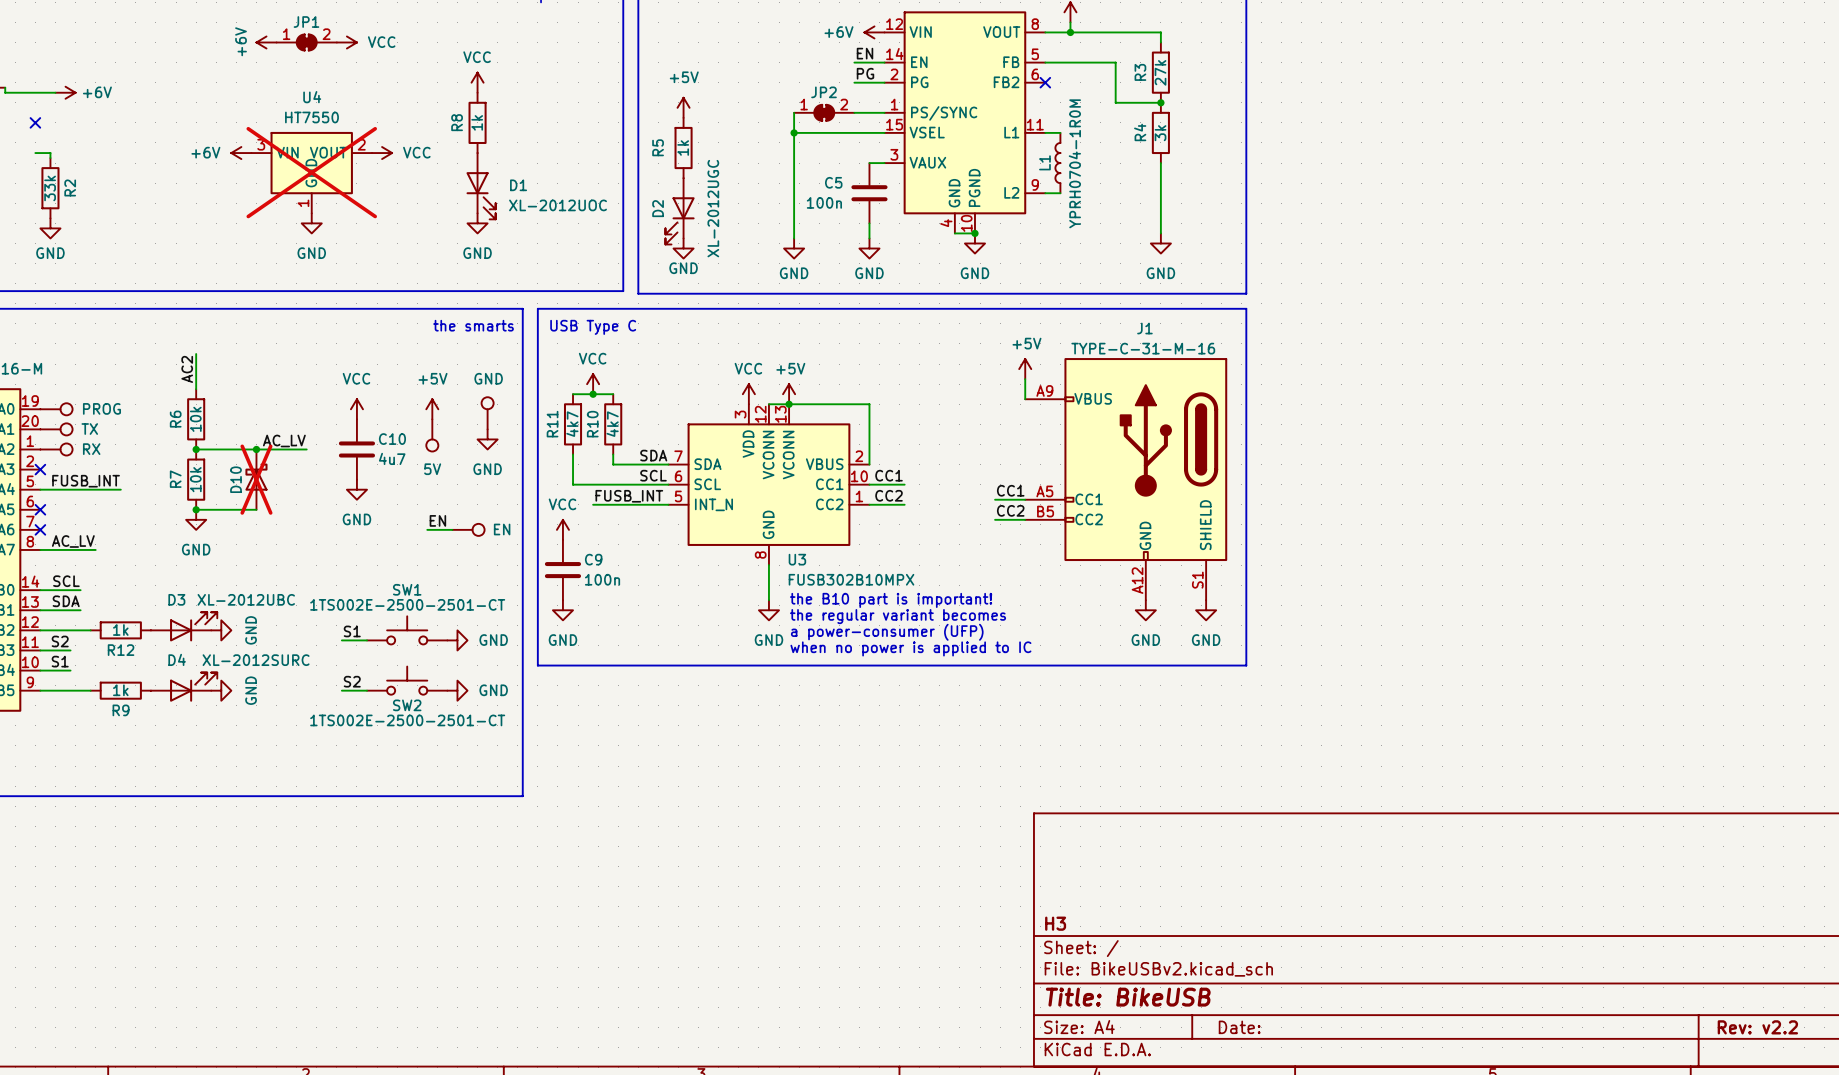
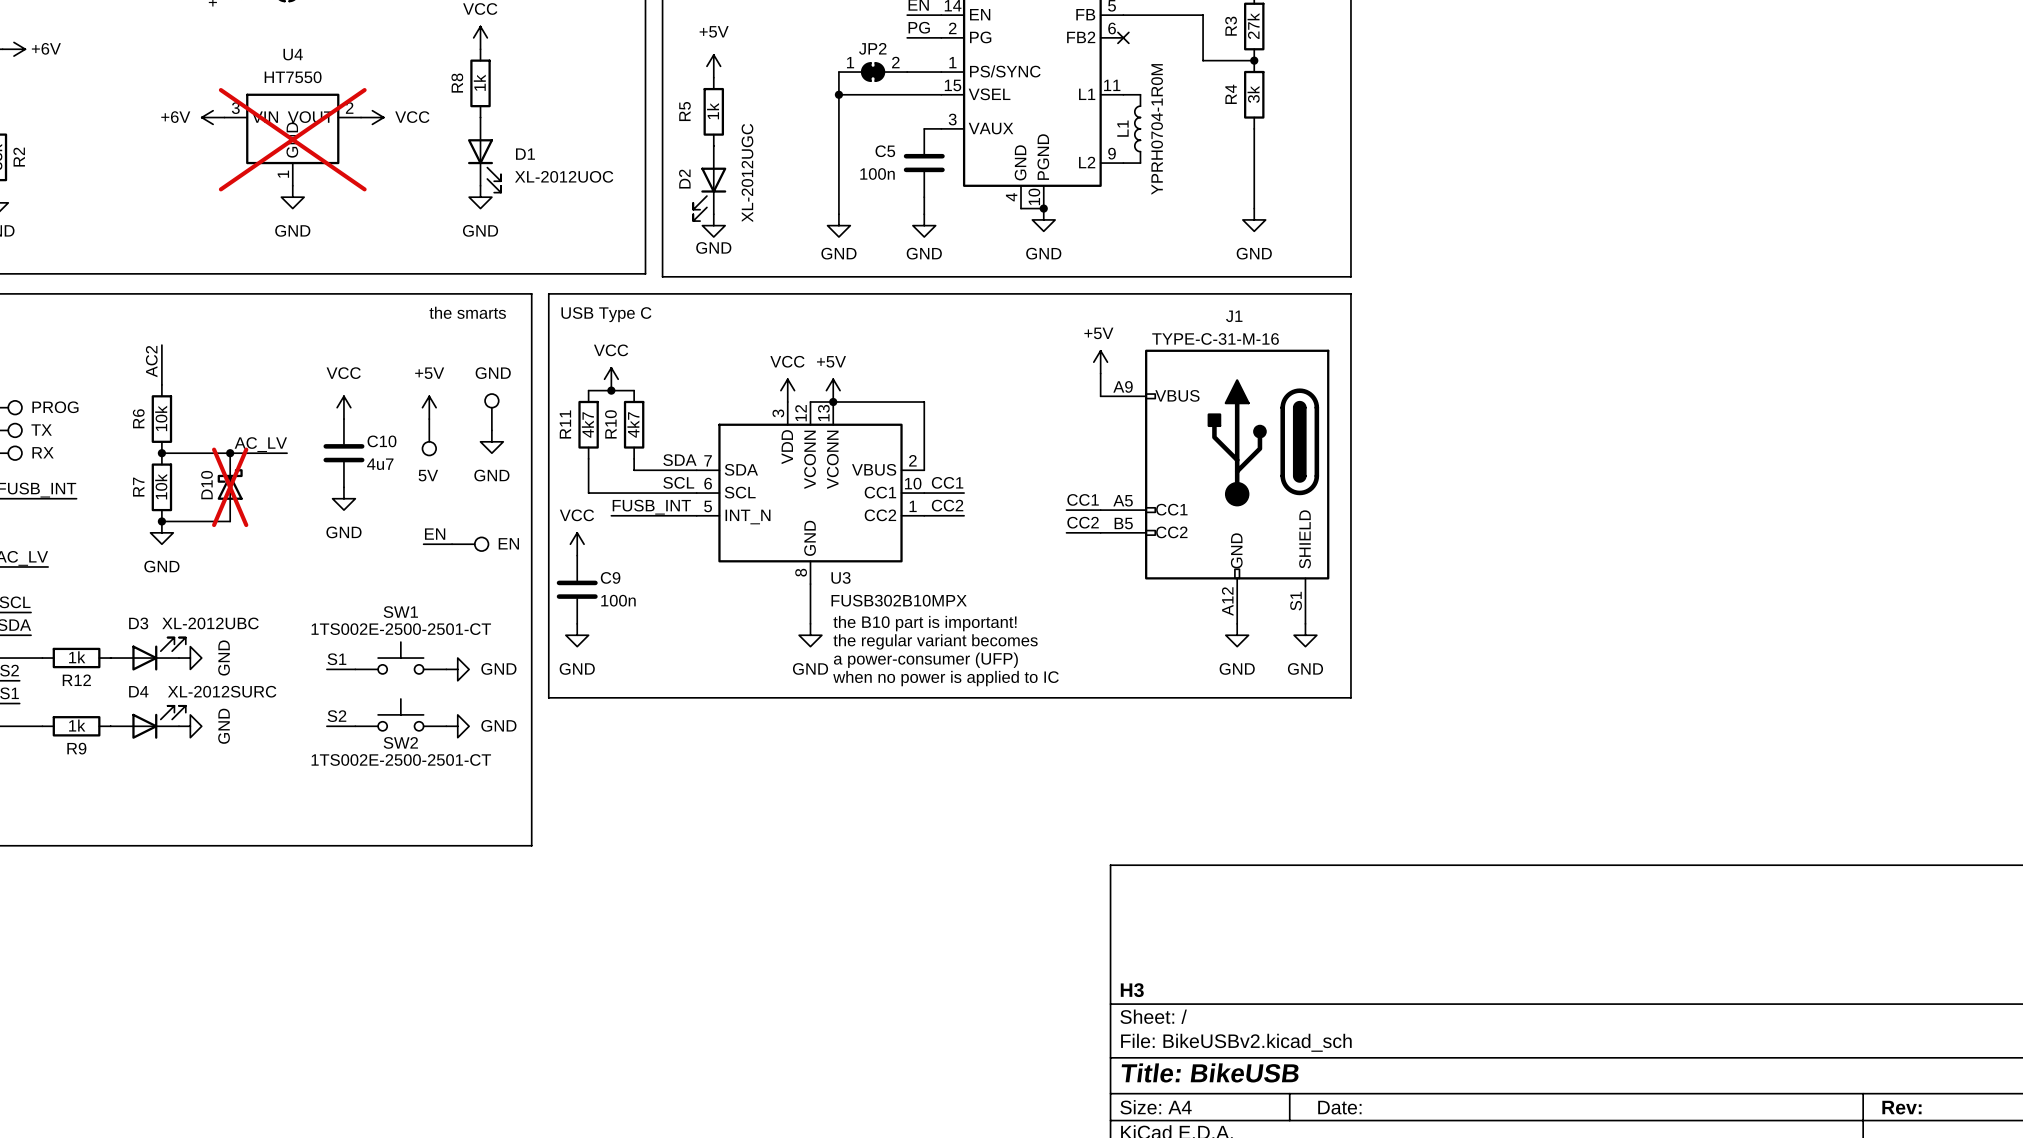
title block: Rev: v2.2 (1757, 1027) -> Rev: (1901, 1107)

